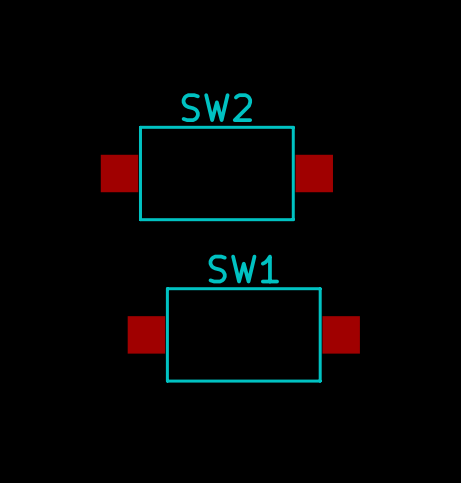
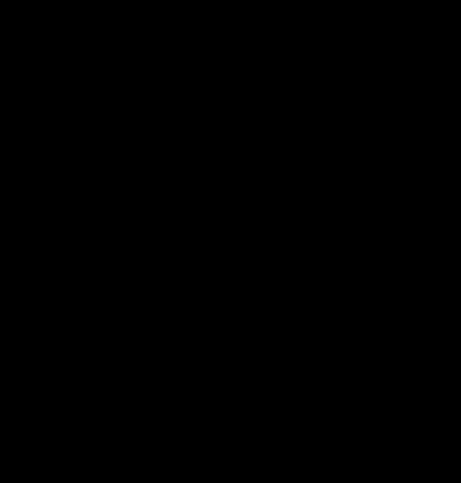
SW2: (216, 173) -> none
SW1: (243, 334) -> none

